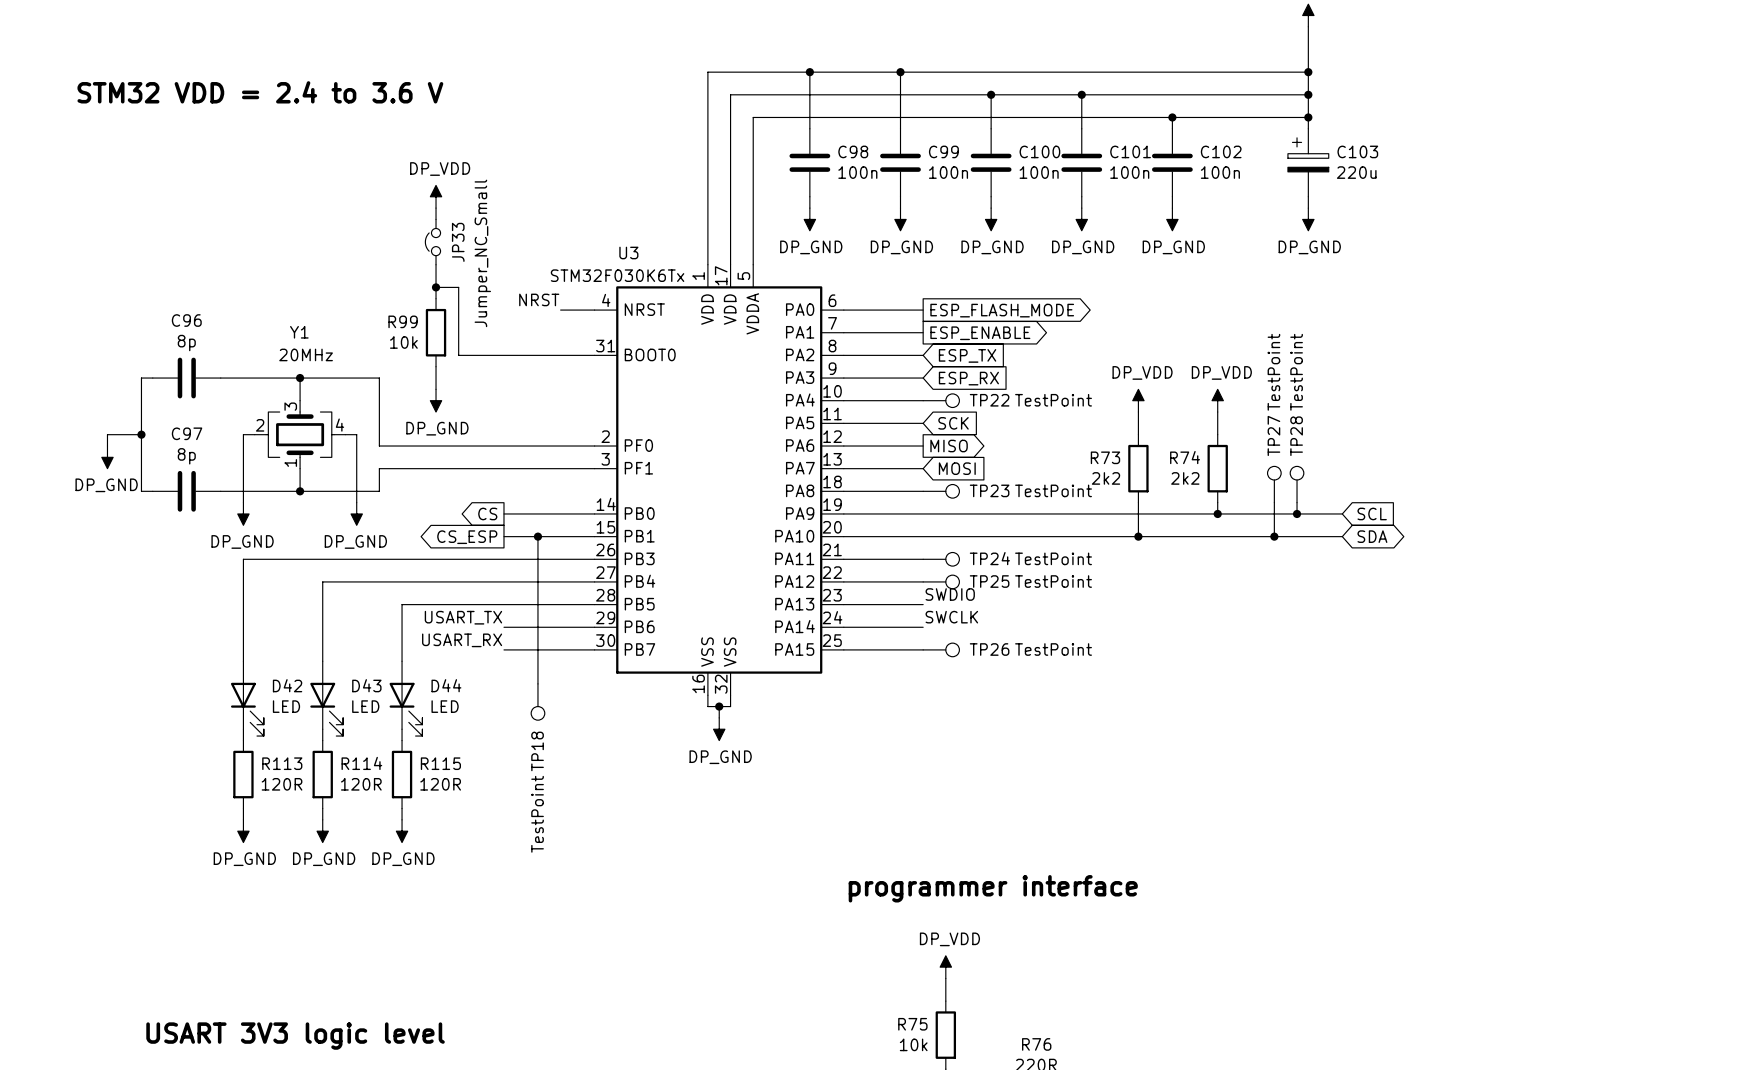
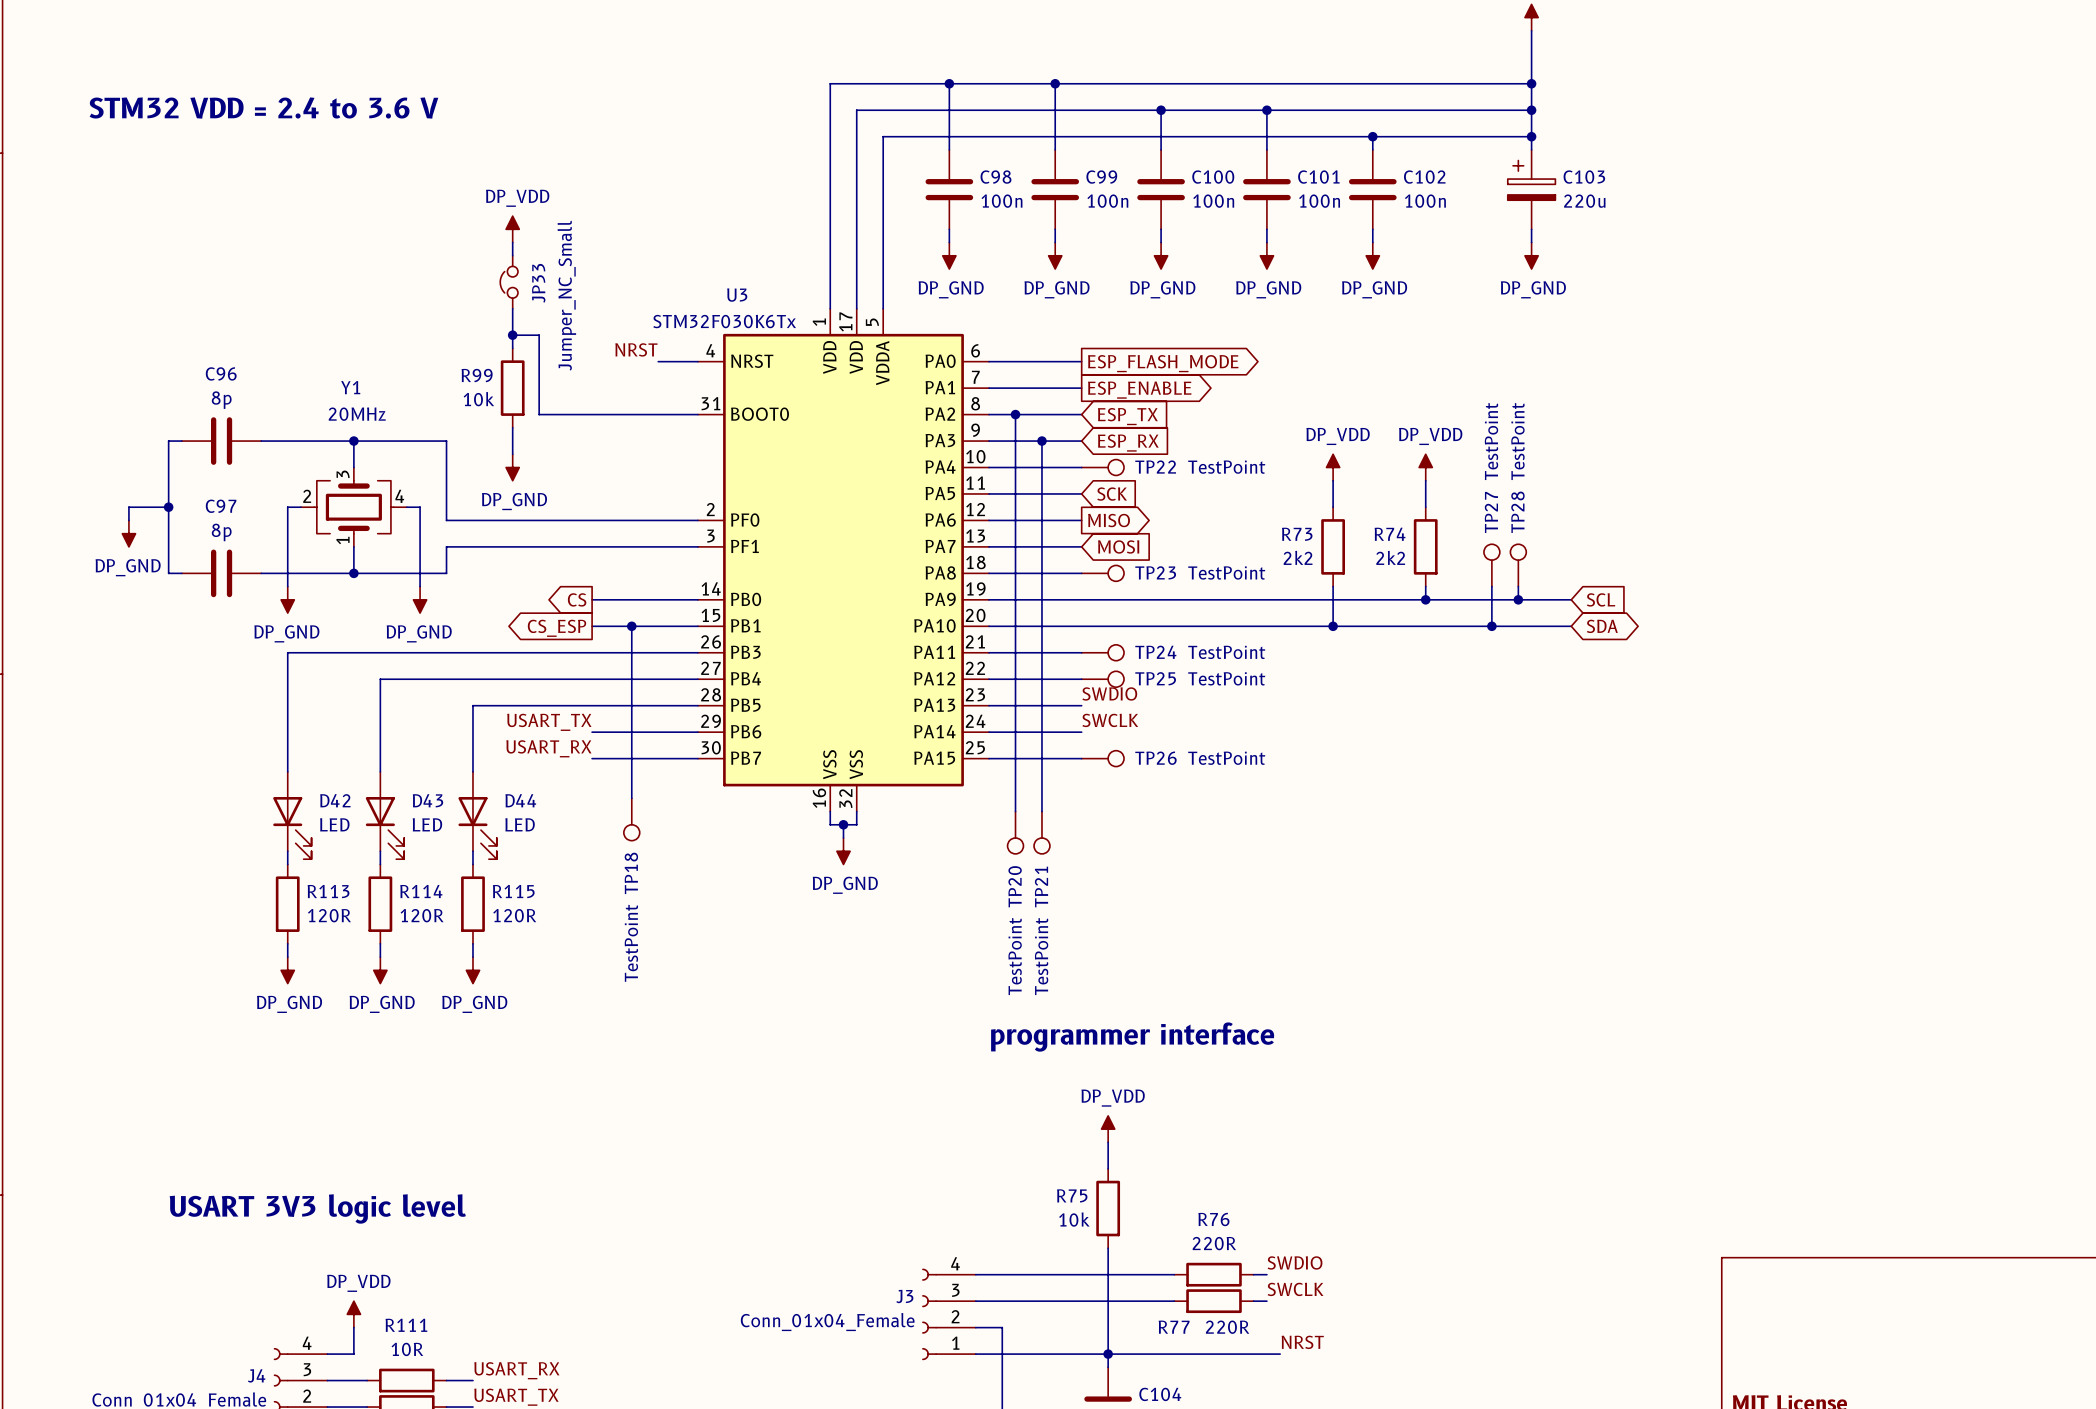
wire: none -> (1015, 414) (1015, 811)
junction: none -> (1015, 414)
wire: none -> (1041, 441) (1041, 811)
junction: none -> (1041, 441)
TP20: none -> TestPoint (1015, 832)
TP21: none -> TestPoint (1041, 832)

